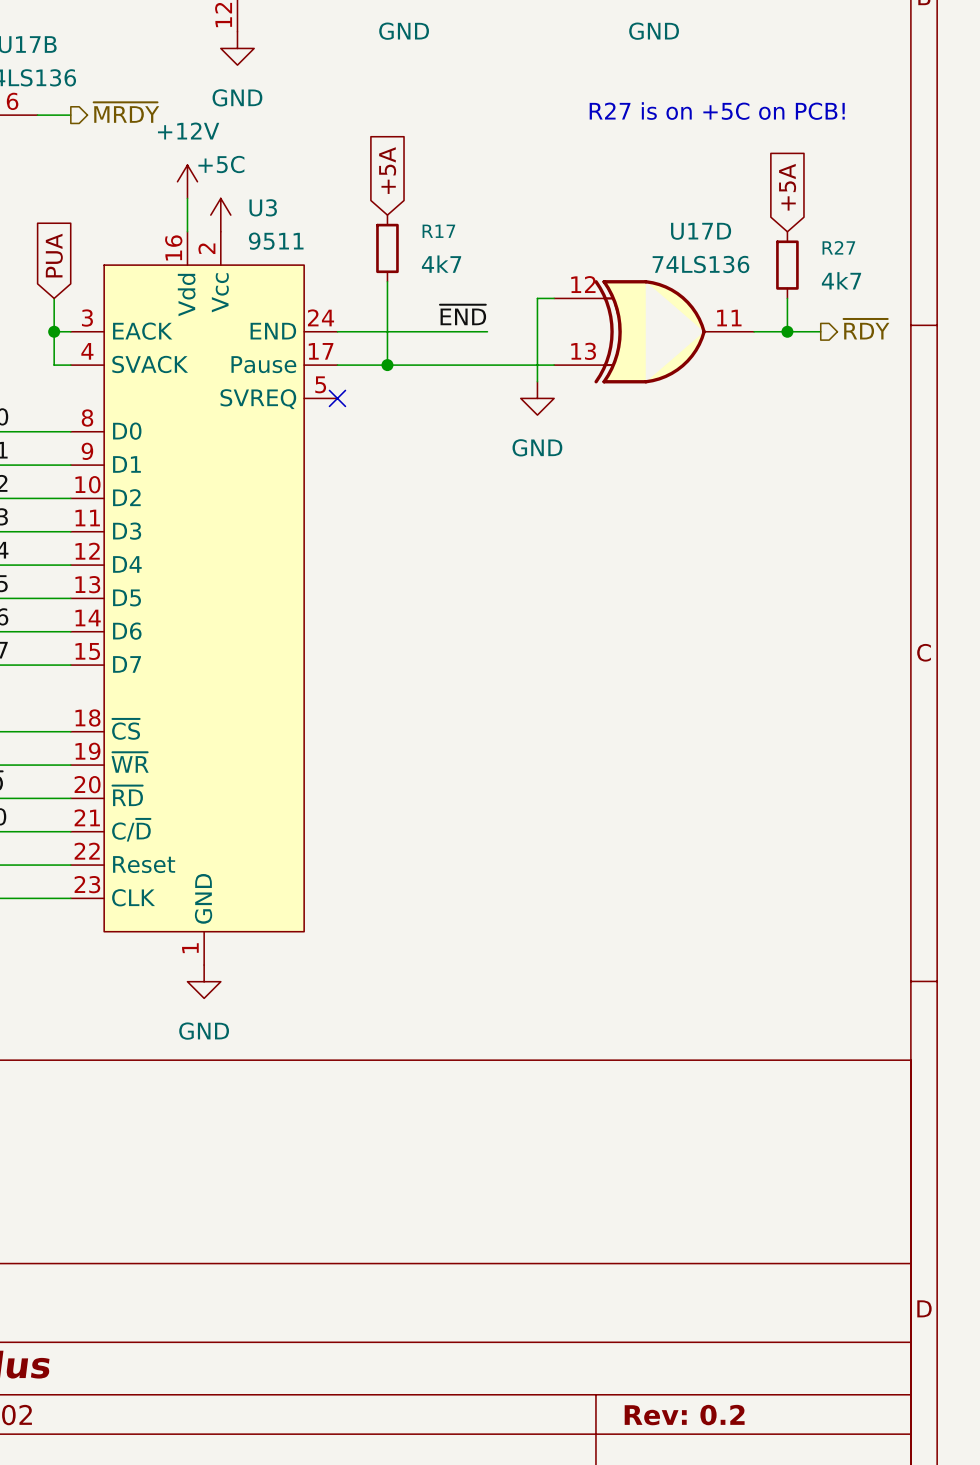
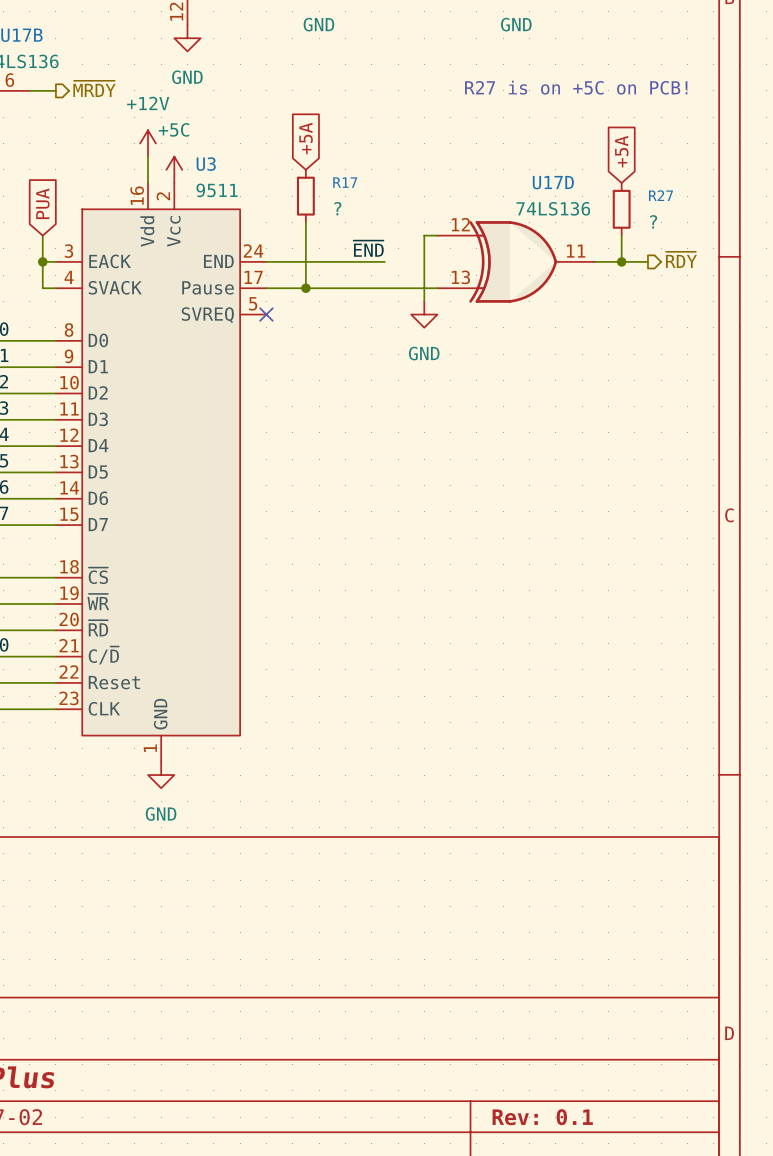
R17 value: 4k7 (441, 264) -> ? (337, 208)
R27 value: 4k7 (841, 280) -> ? (653, 221)
title block: Rev: 0.2 (684, 1415) -> Rev: 0.1 (542, 1117)

